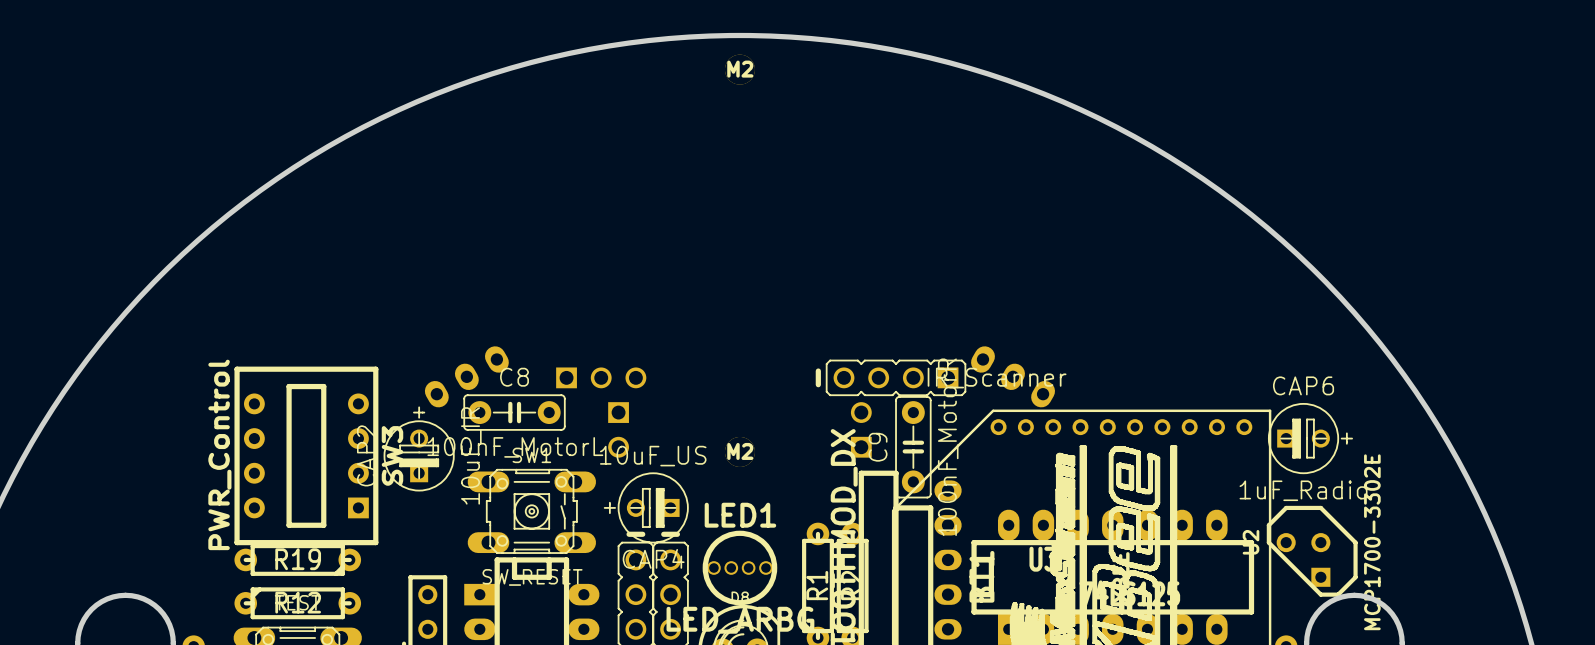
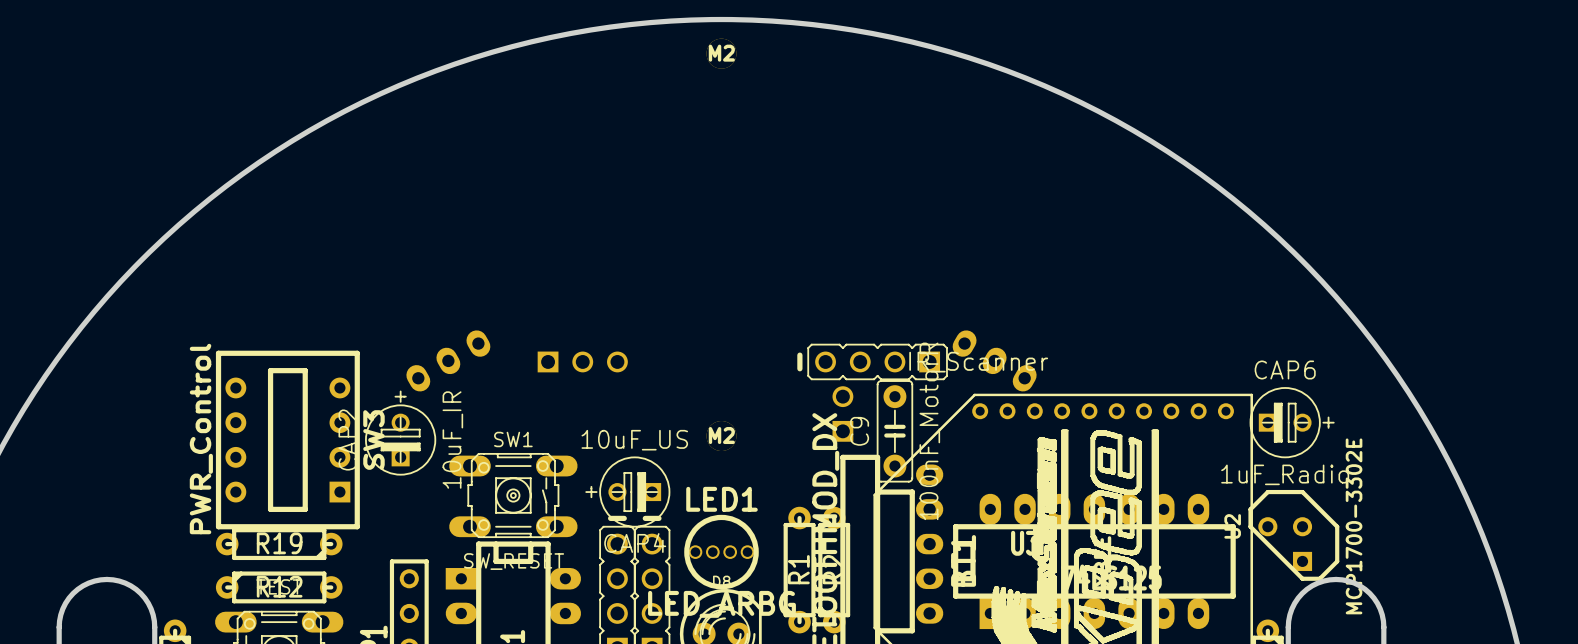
C8: 100nF_MotorL (514, 412) -> none
part: (618, 429) -> none

